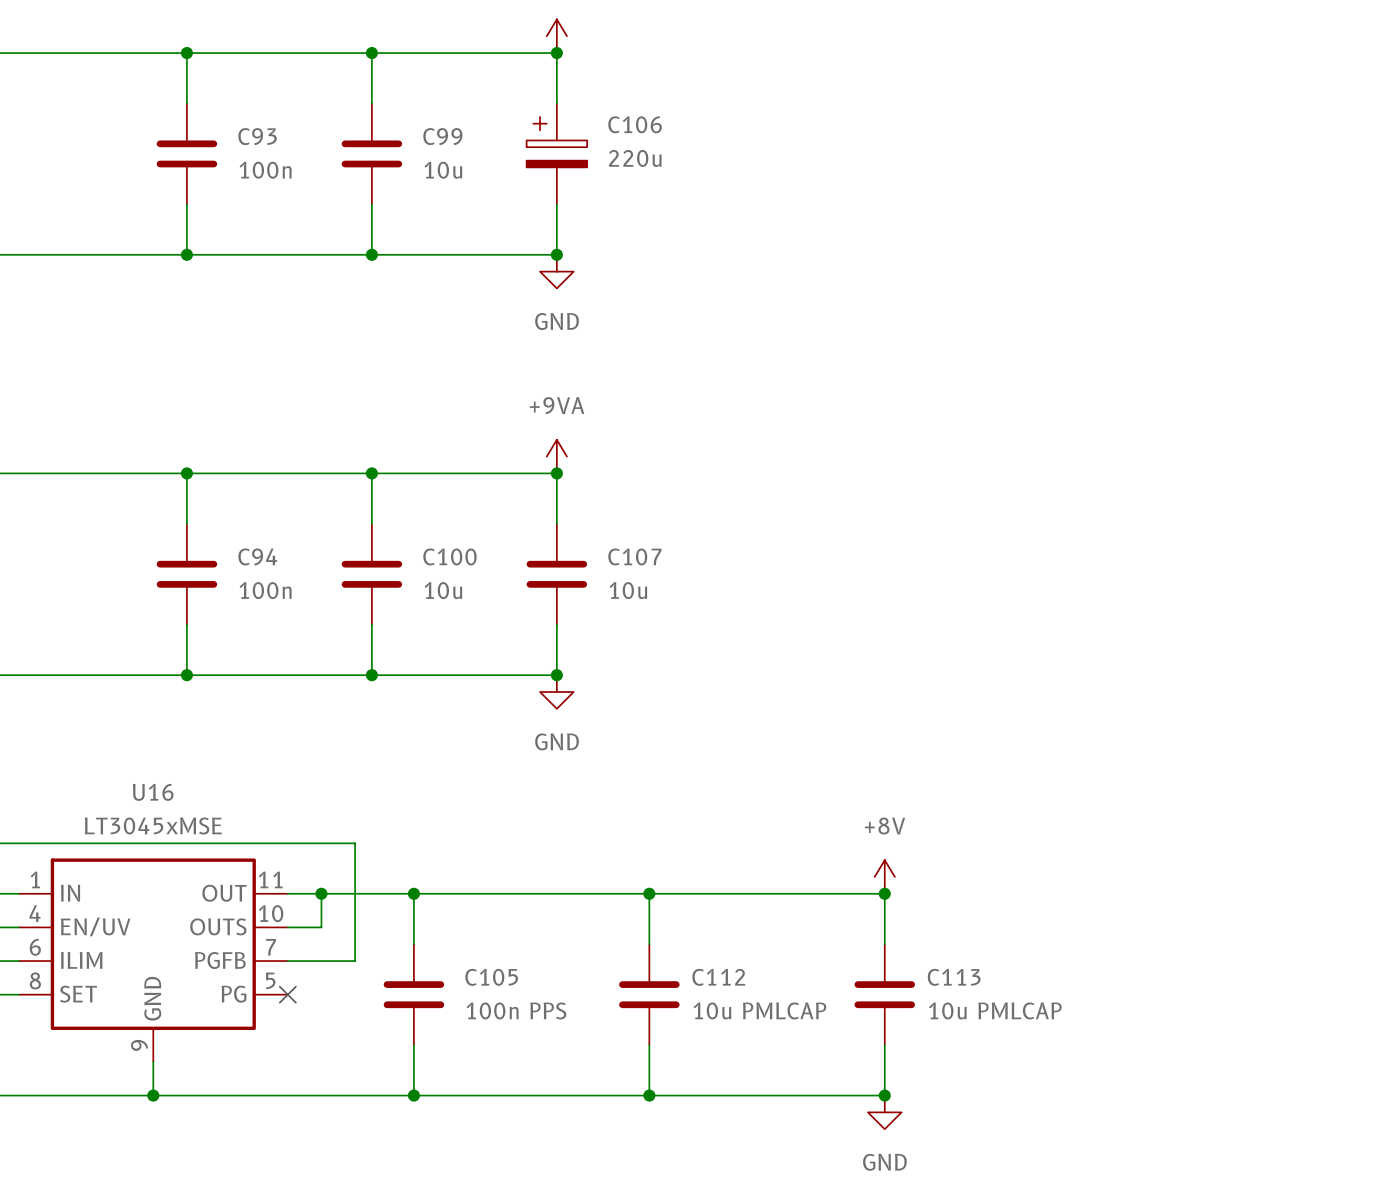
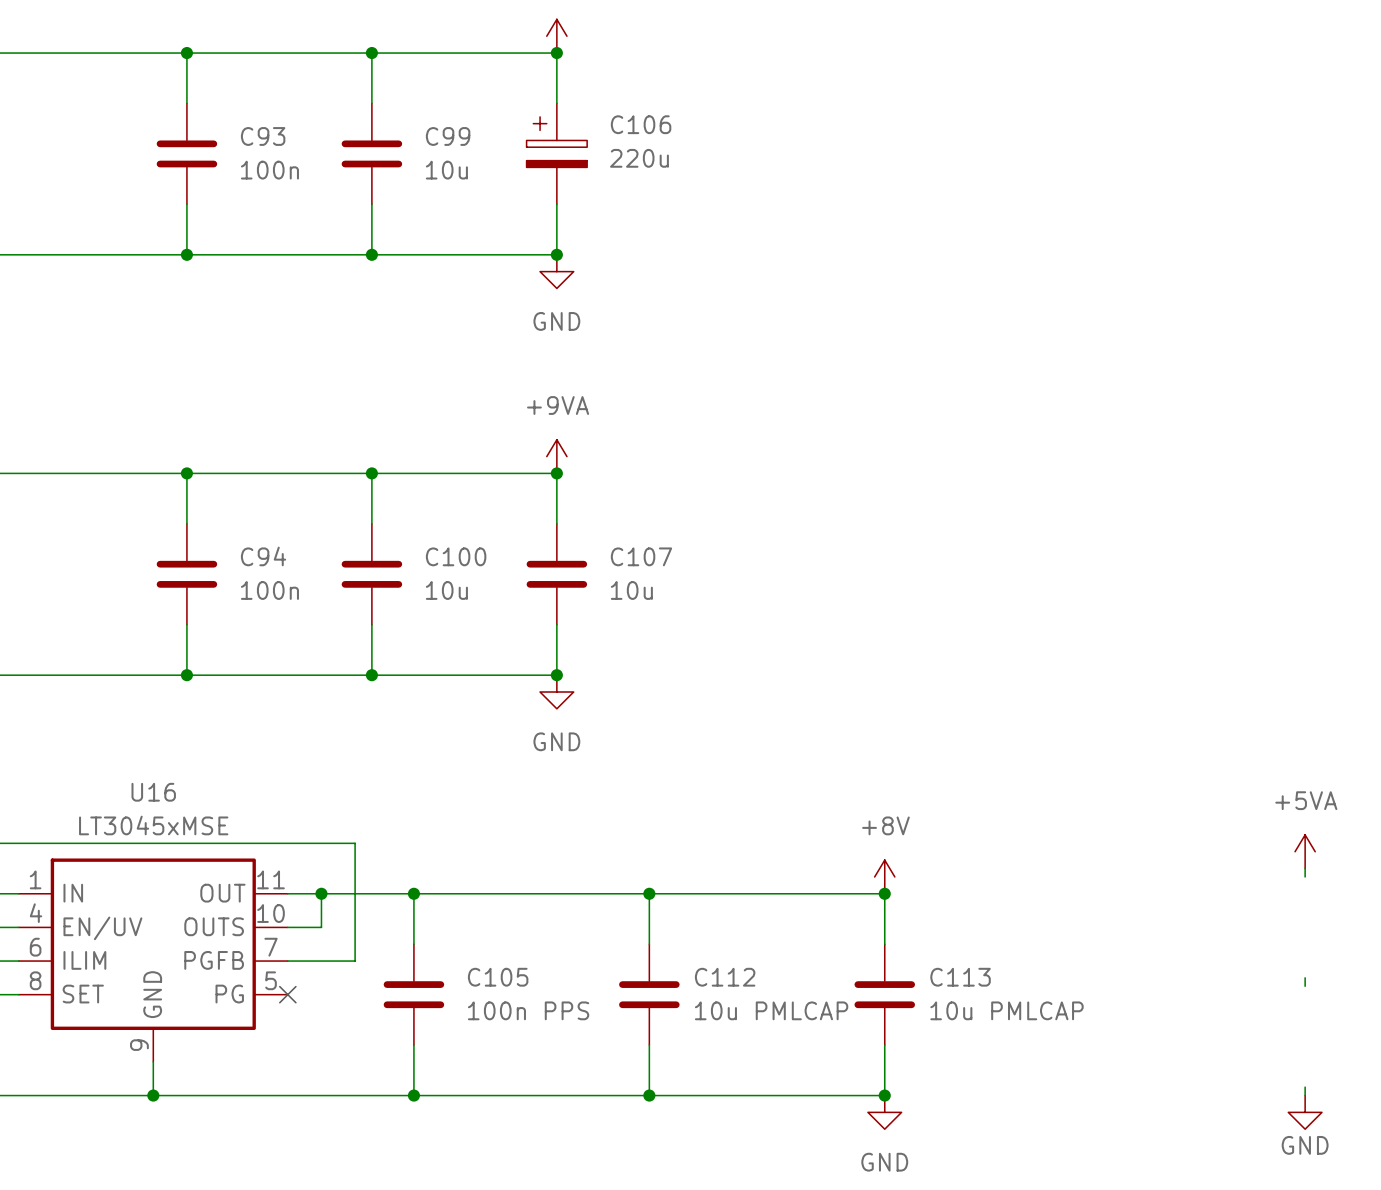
power symbol: none -> +5VA (1305, 851)
wire: none -> (1305, 868) (1305, 876)
wire: none -> (1305, 977) (1305, 986)
wire: none -> (1305, 1087) (1305, 1095)
power symbol: none -> GND (1305, 1112)

